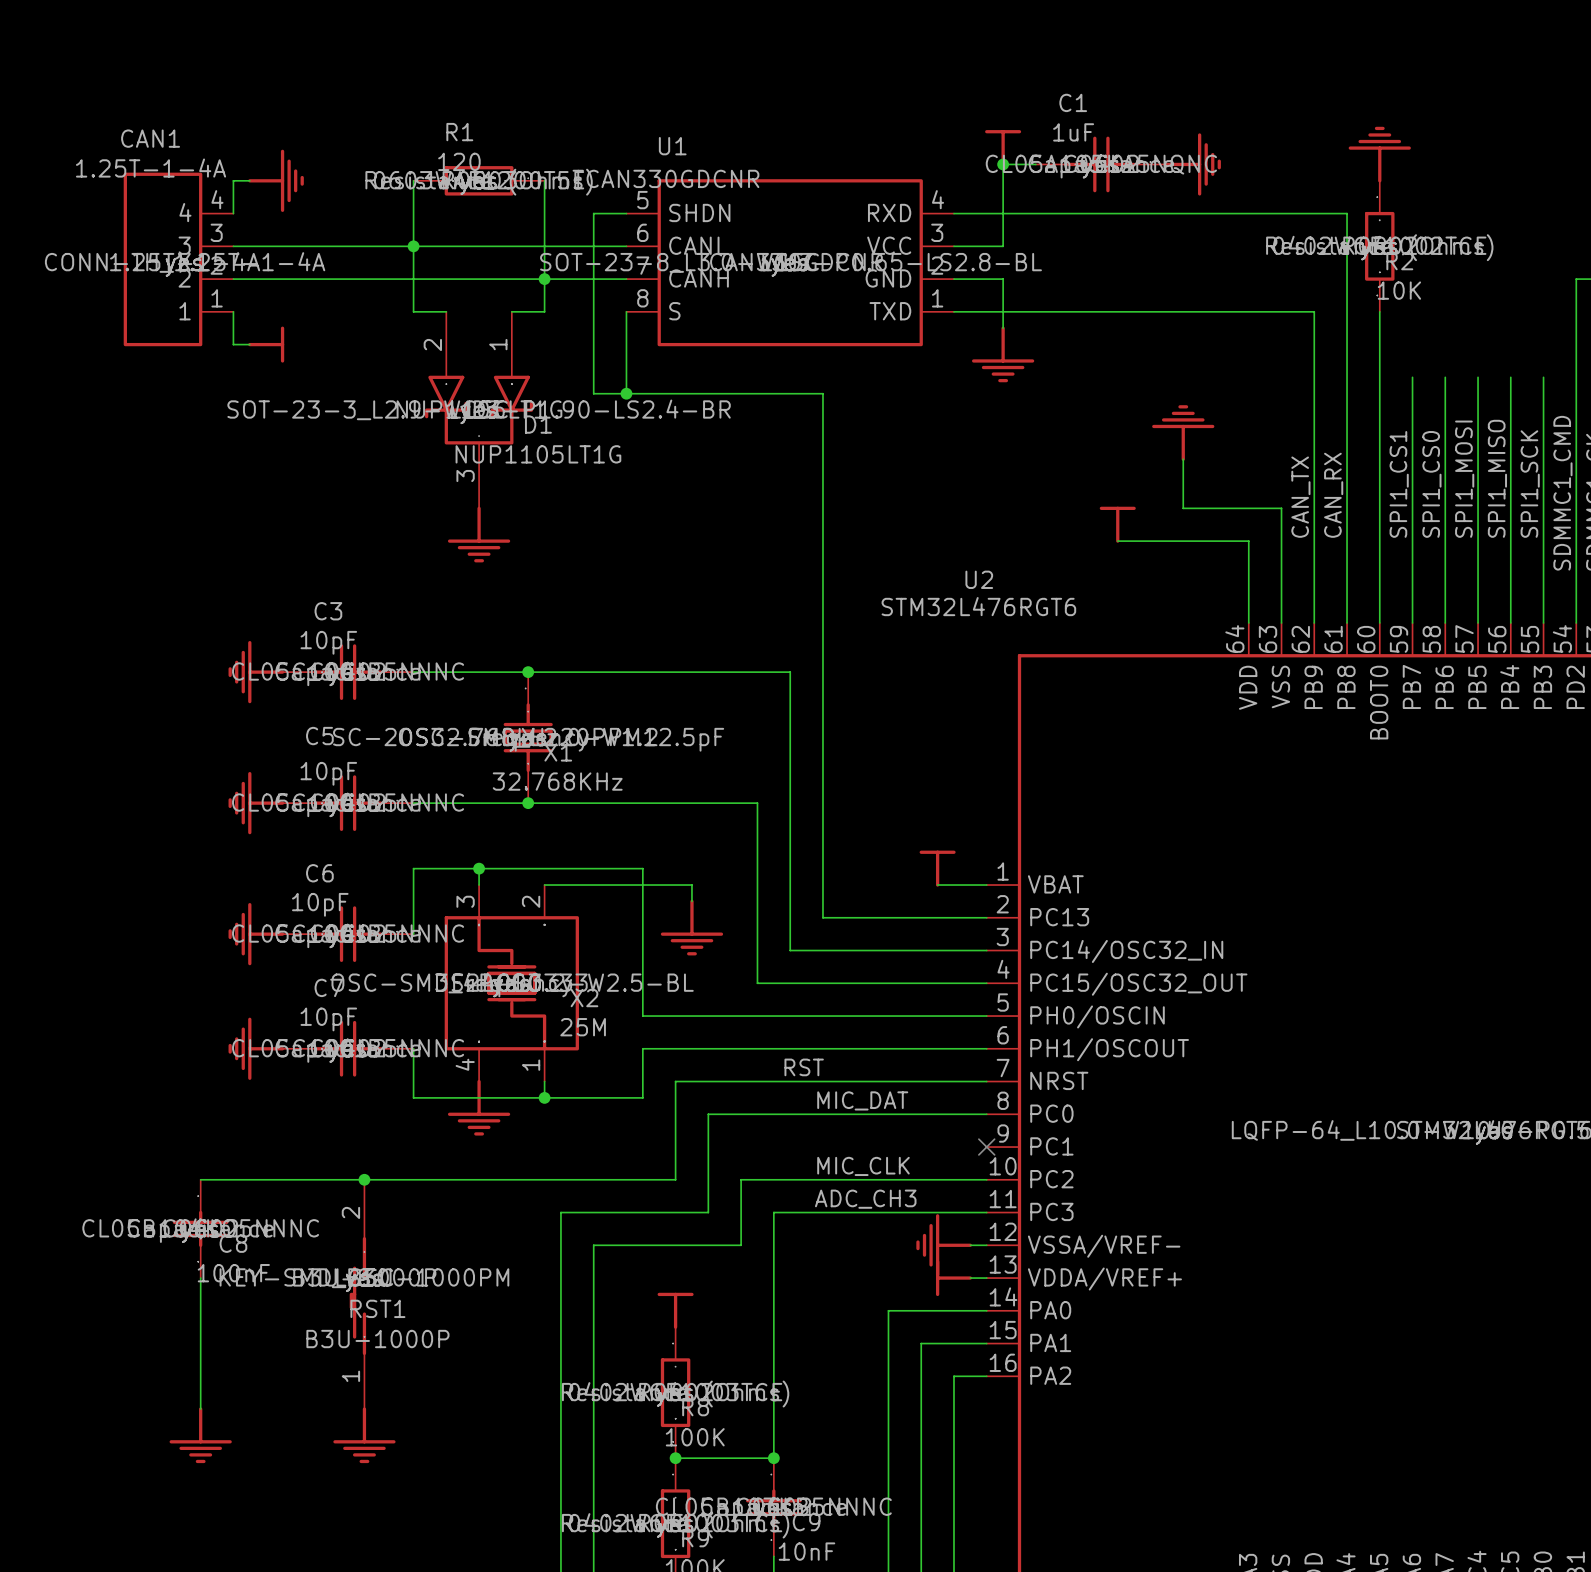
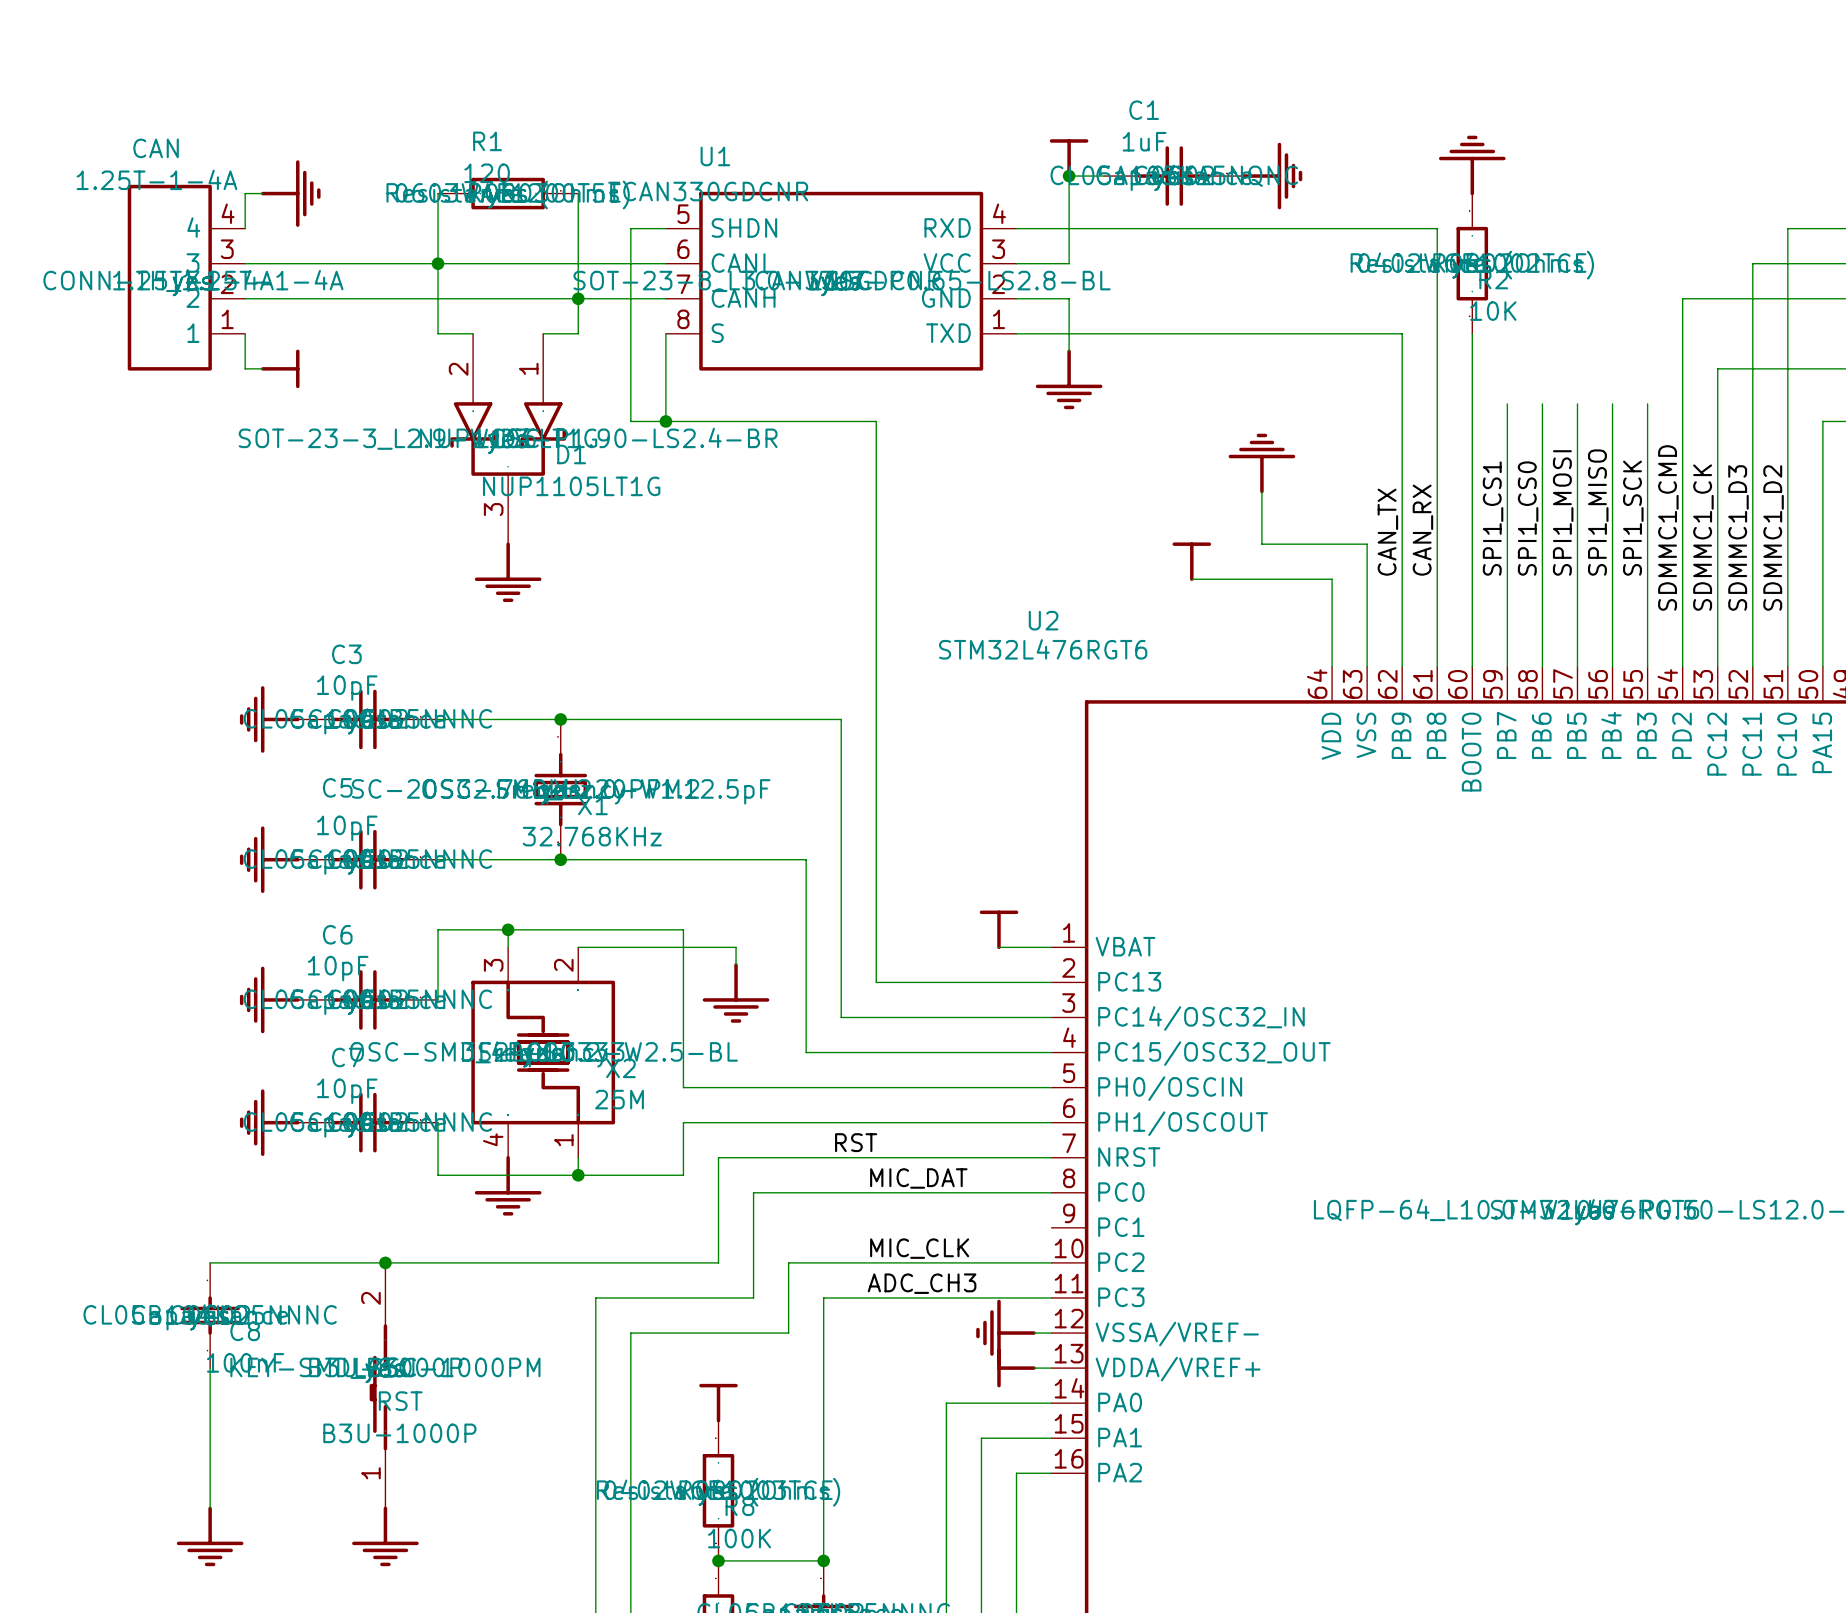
CAN1 name: CAN1 (150, 138) -> CAN (156, 148)
no-connect mark: (986, 1147) -> none
RST1 name: RST1 (377, 1308) -> RST (400, 1401)

